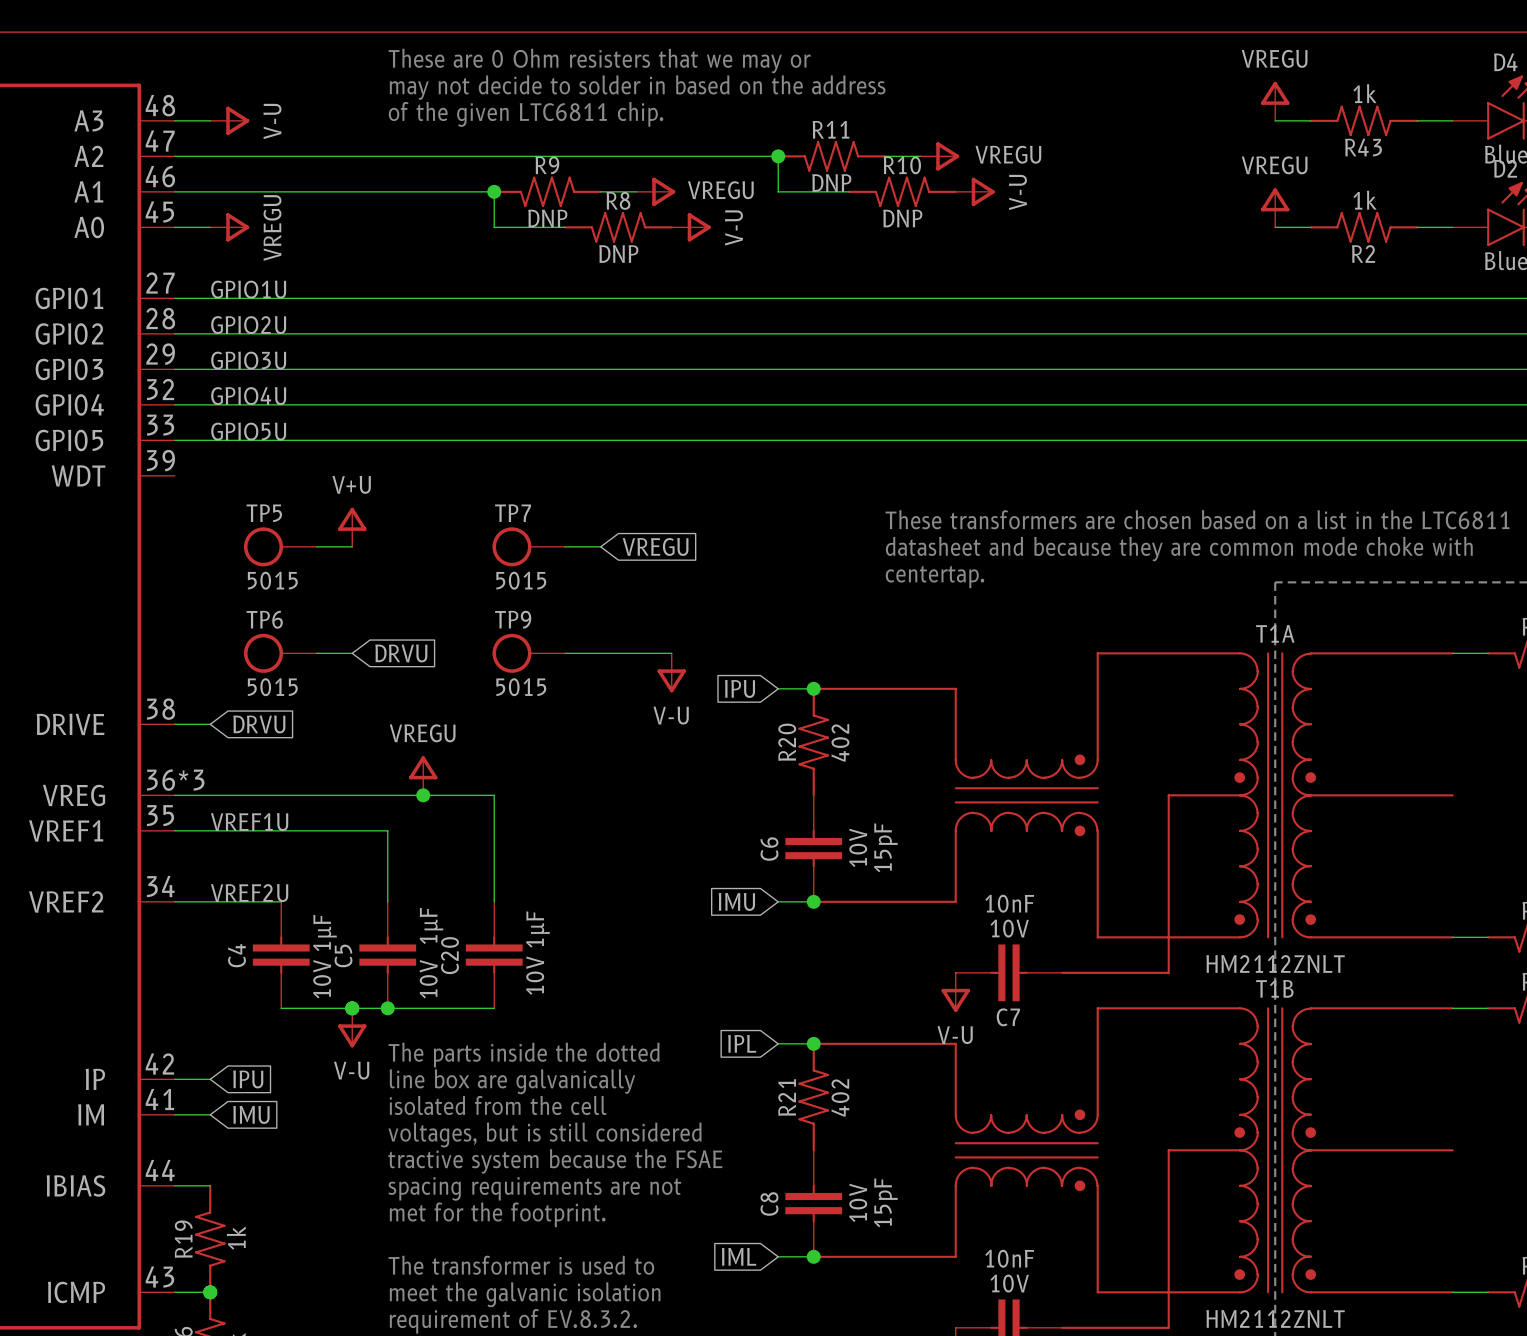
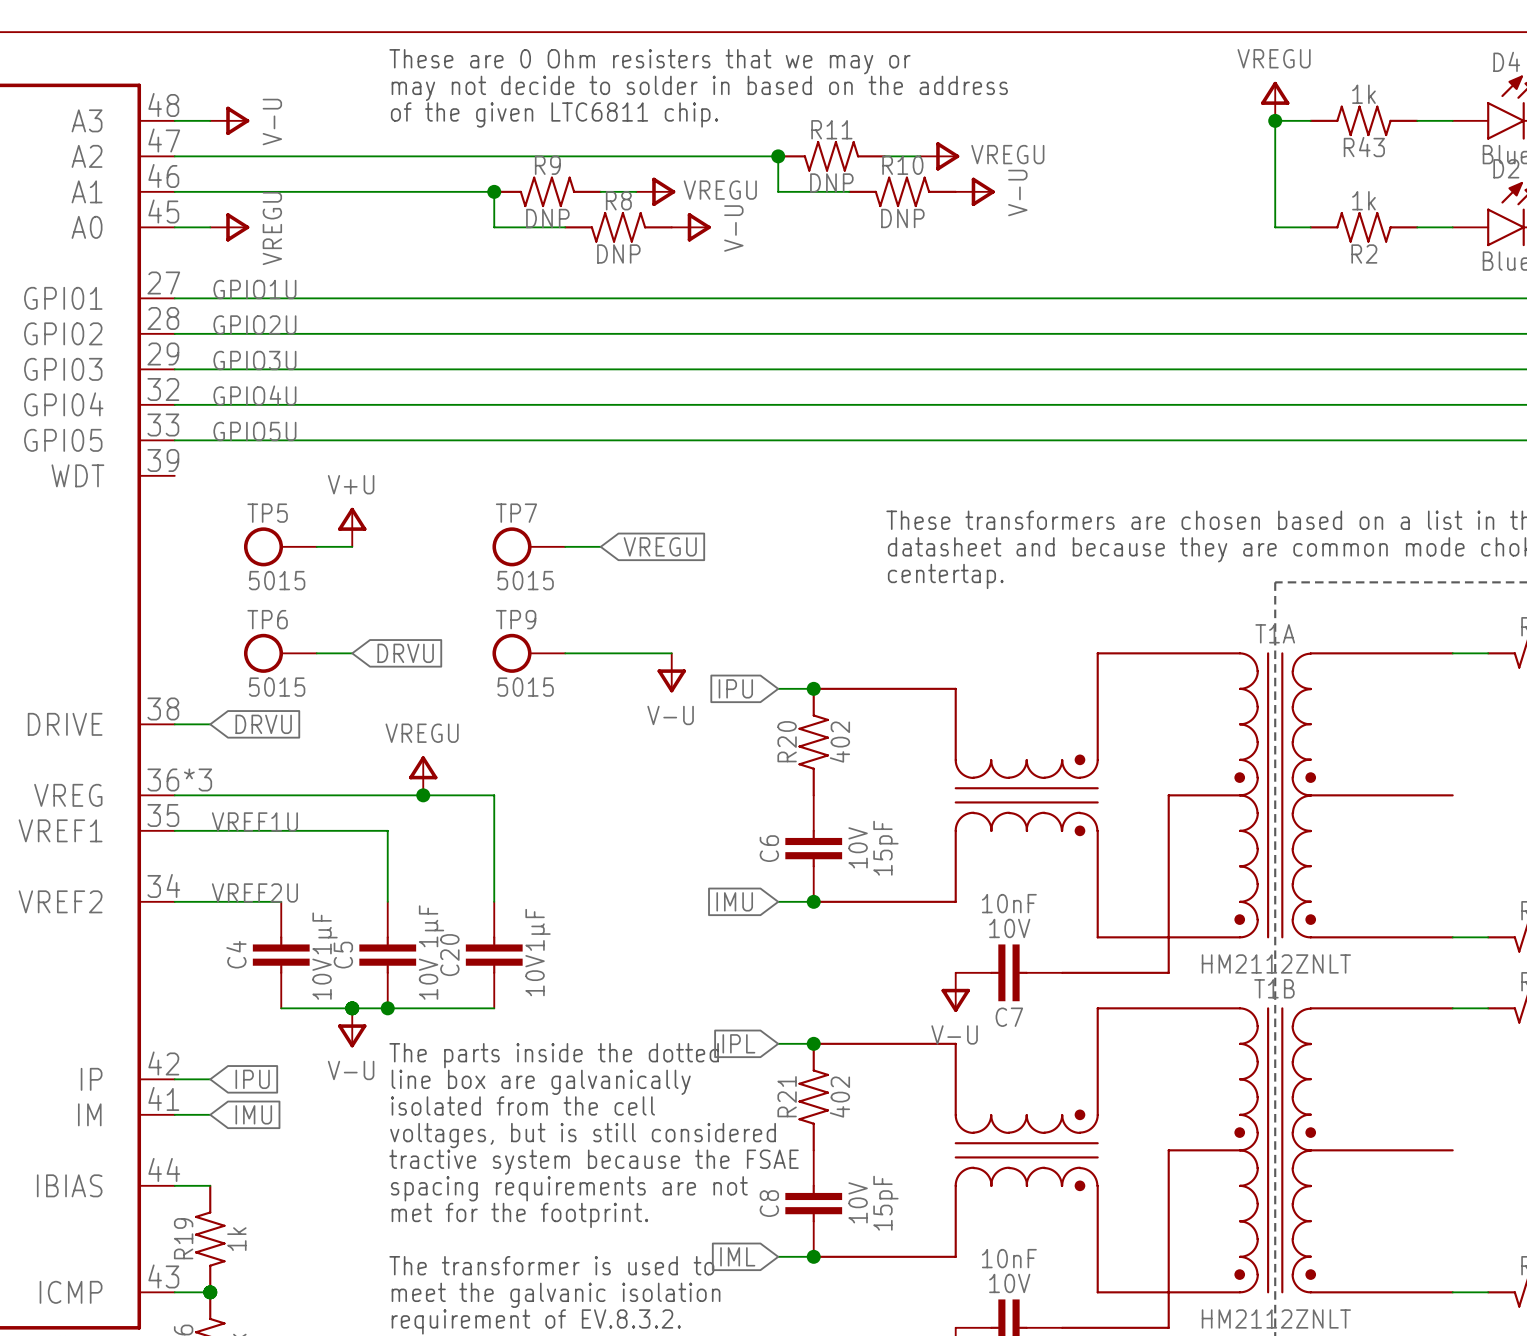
wire: none -> (1275, 120) (1275, 227)
junction: none -> (1275, 120)
power symbol: VREGU (1275, 207) -> none

